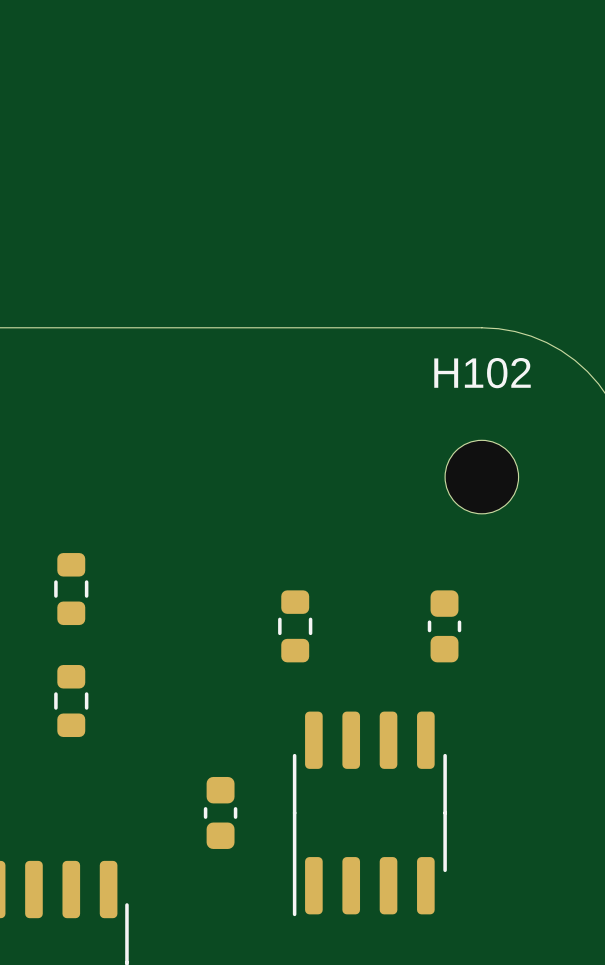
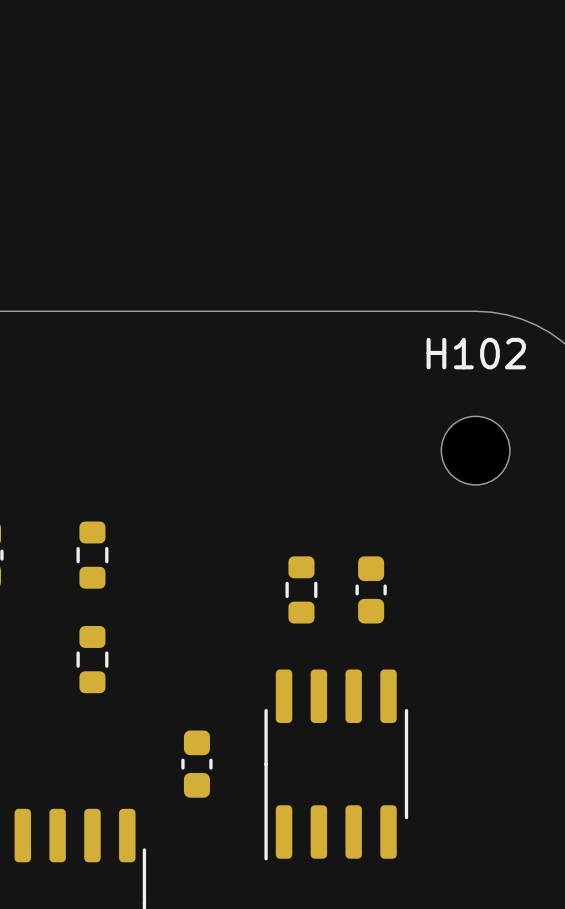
part position: (444, 626) -> (371, 589)
part position: (220, 812) -> (196, 764)
part position: (369, 813) -> (336, 764)

